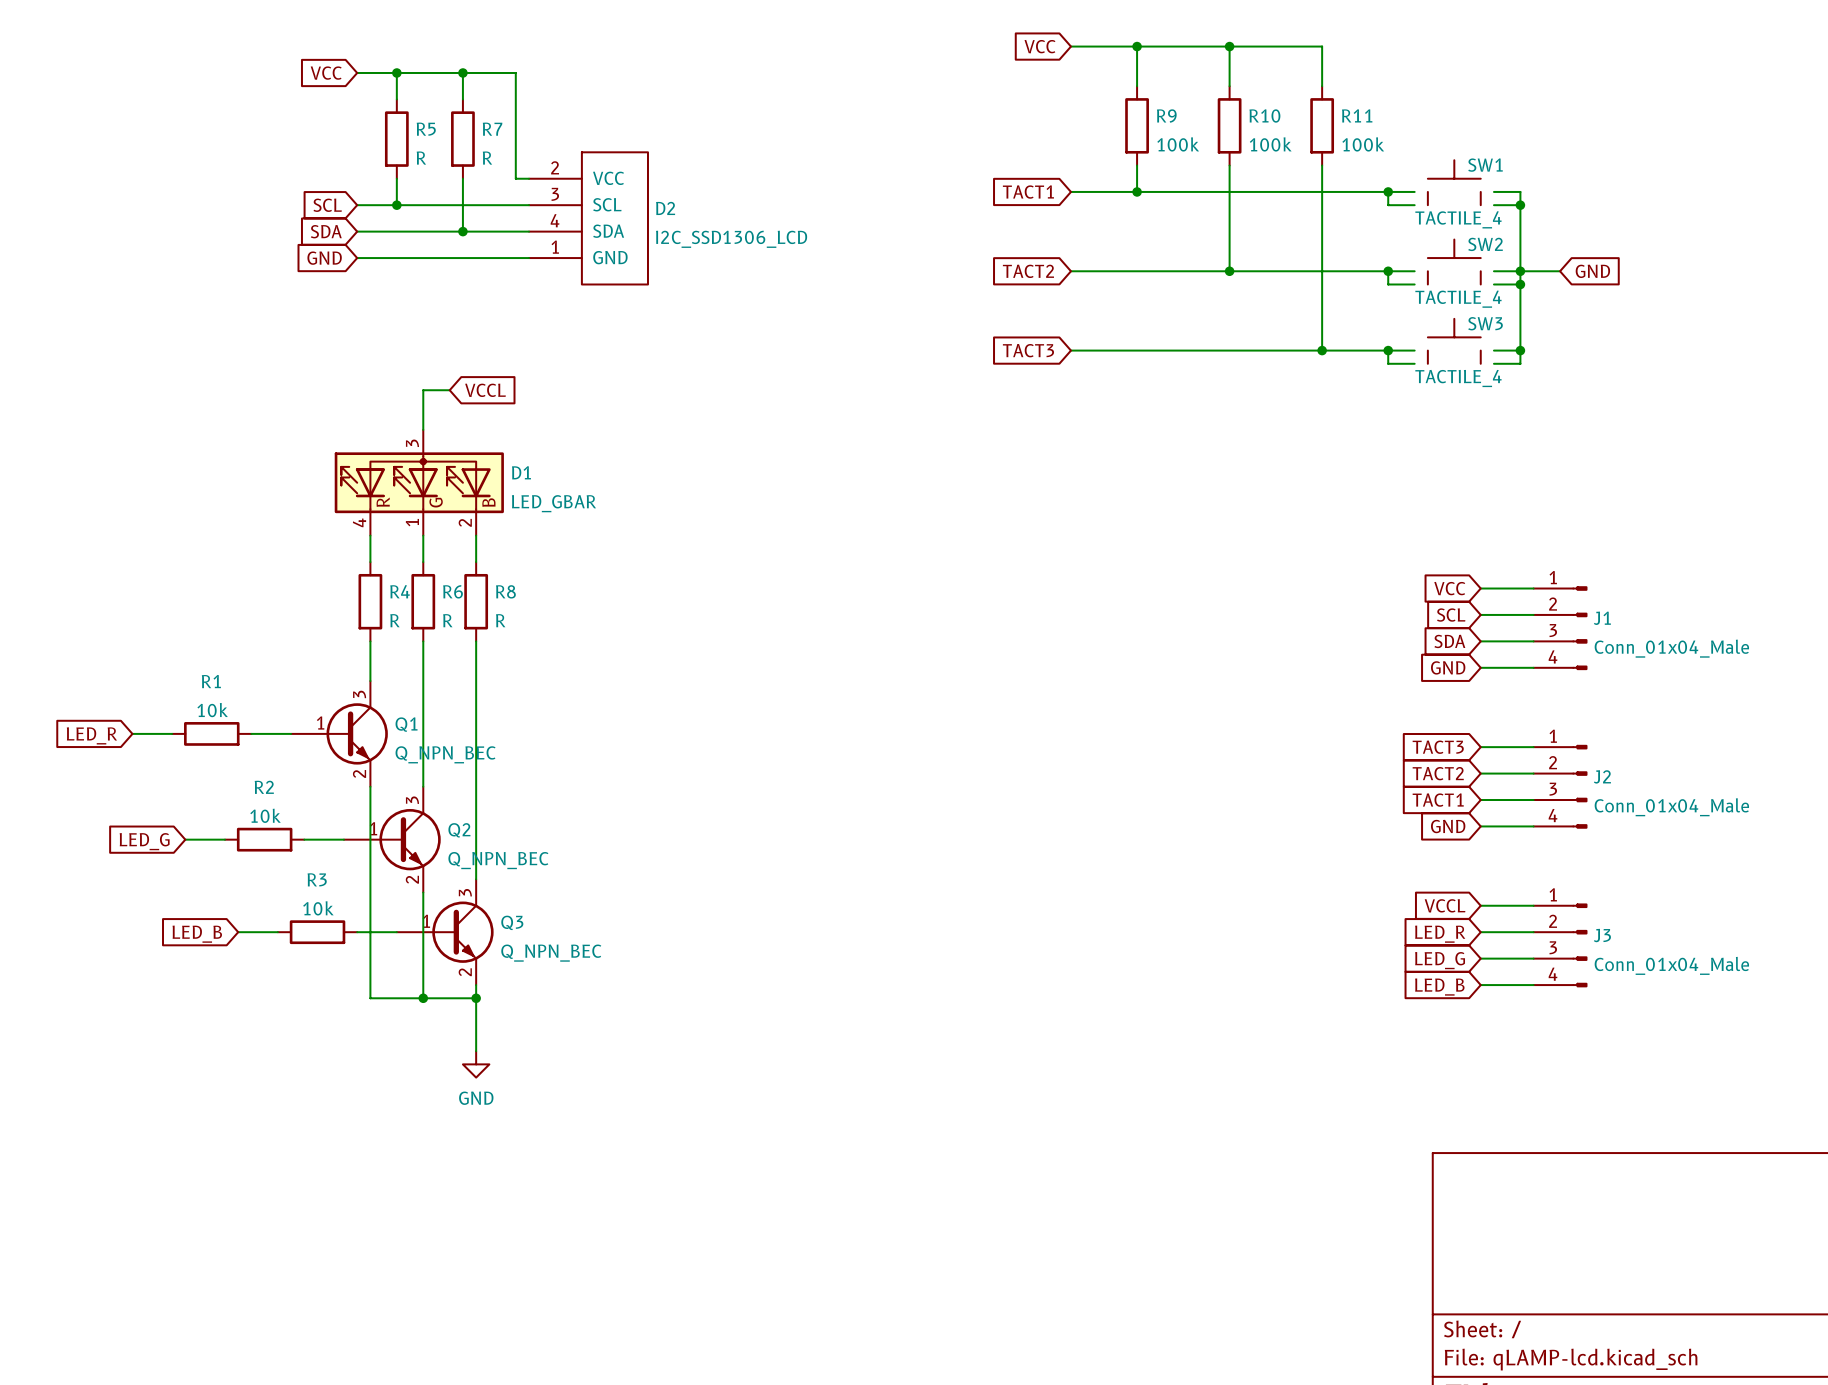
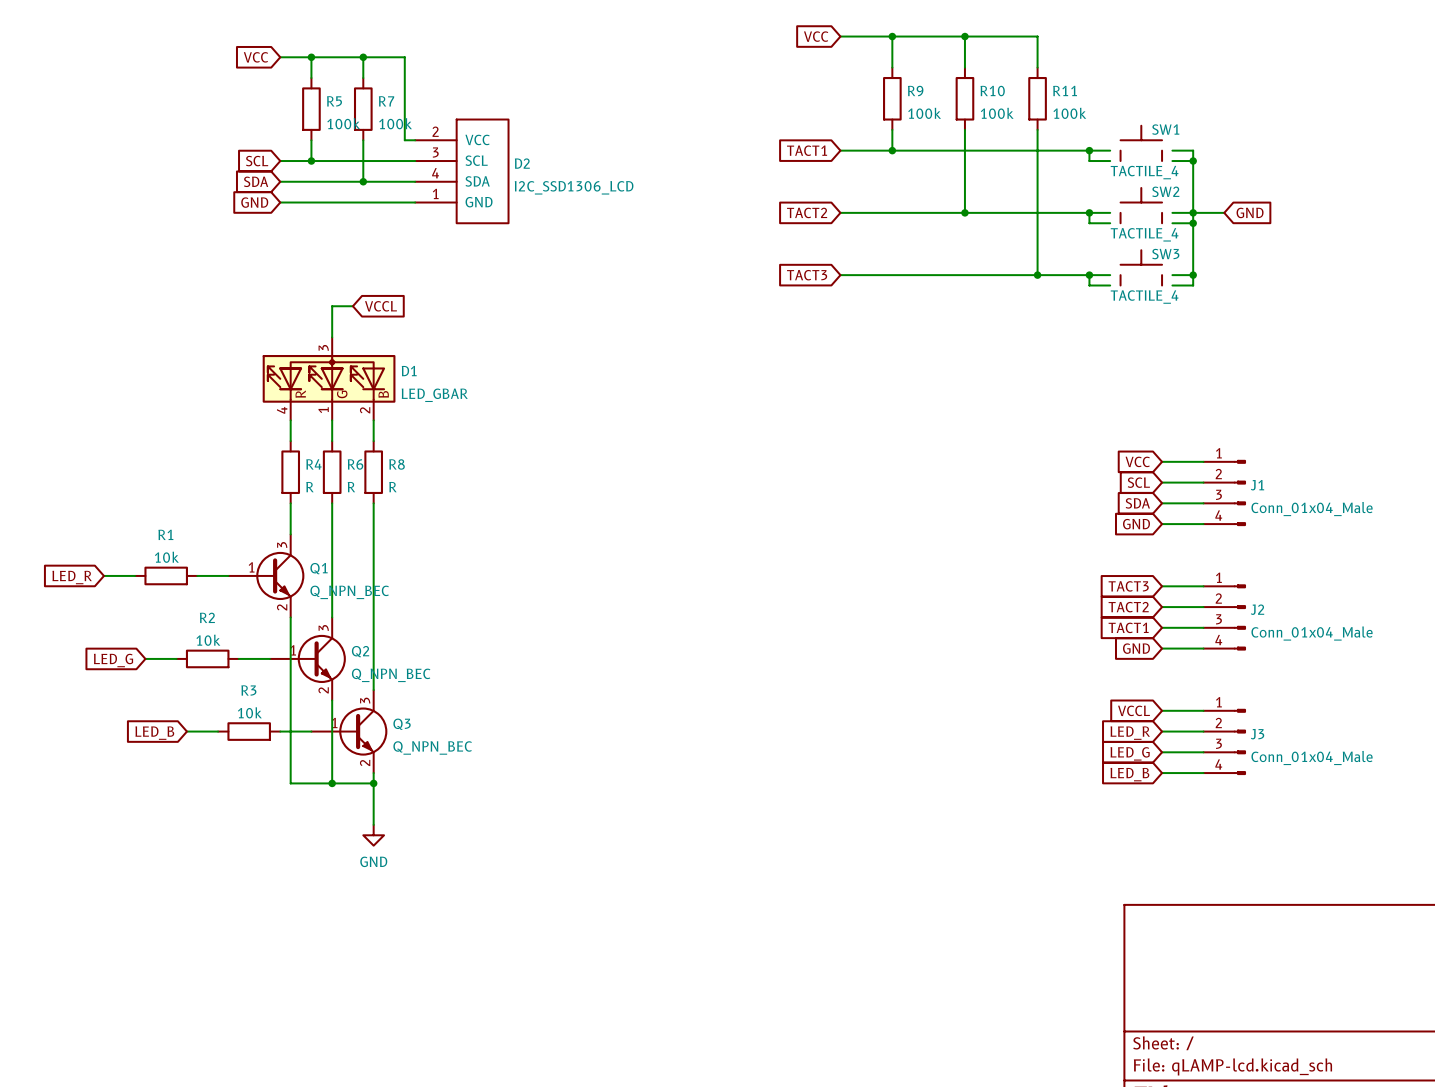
R5 value: R (421, 158) -> 100k (343, 123)
R7 value: R (487, 158) -> 100k (395, 123)

